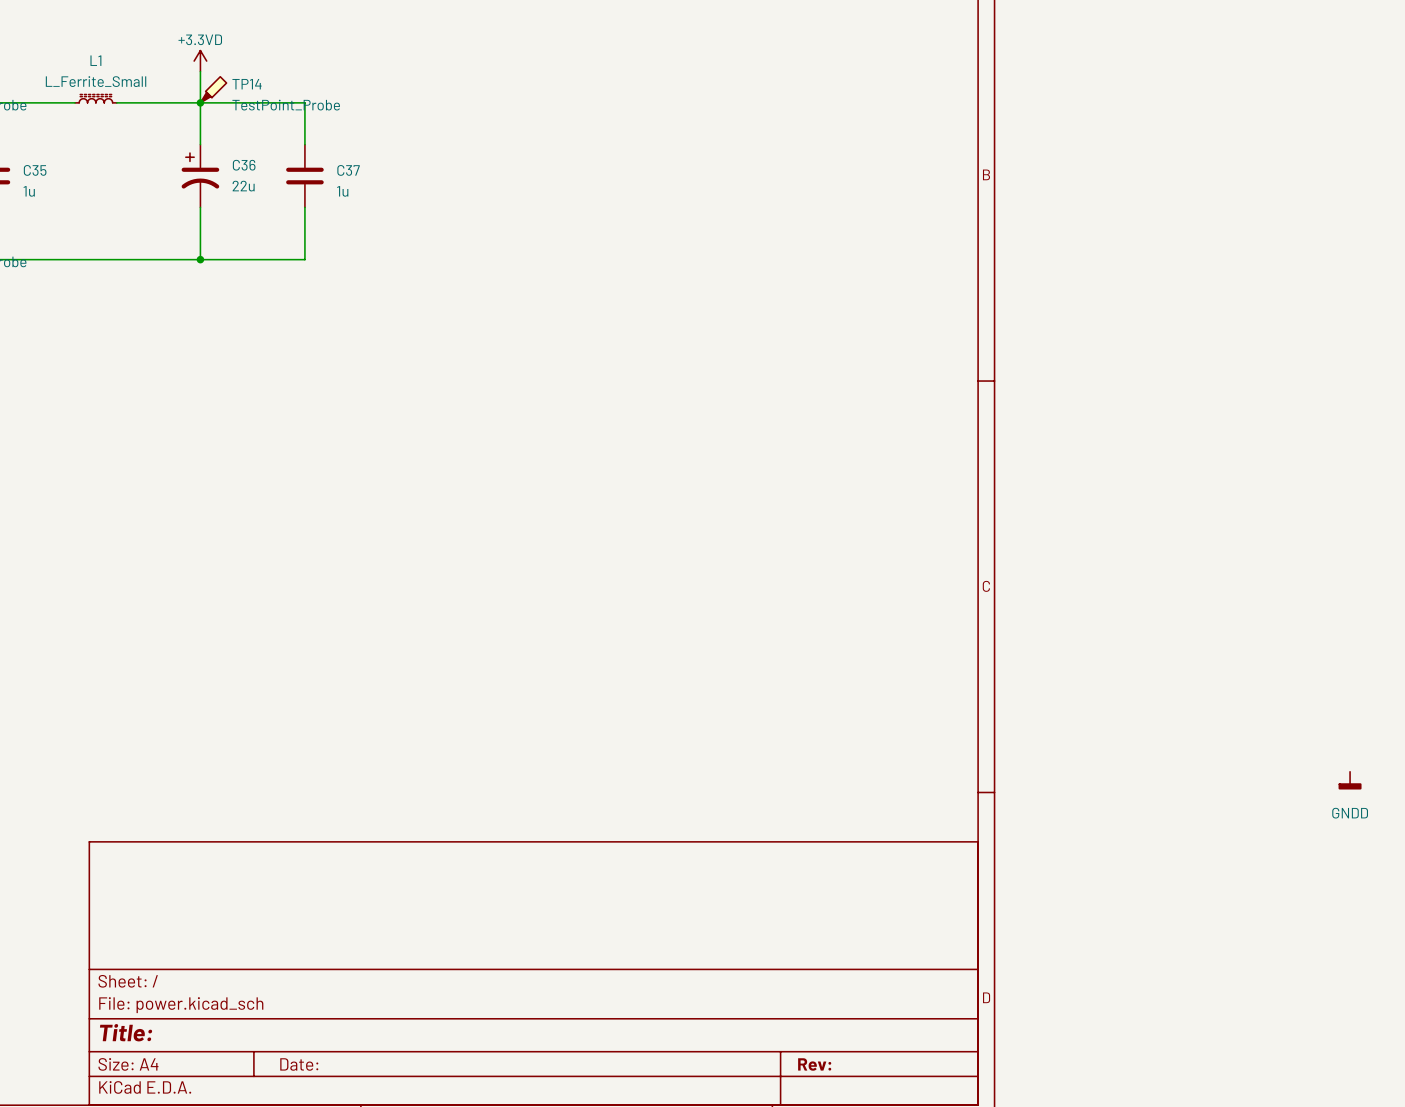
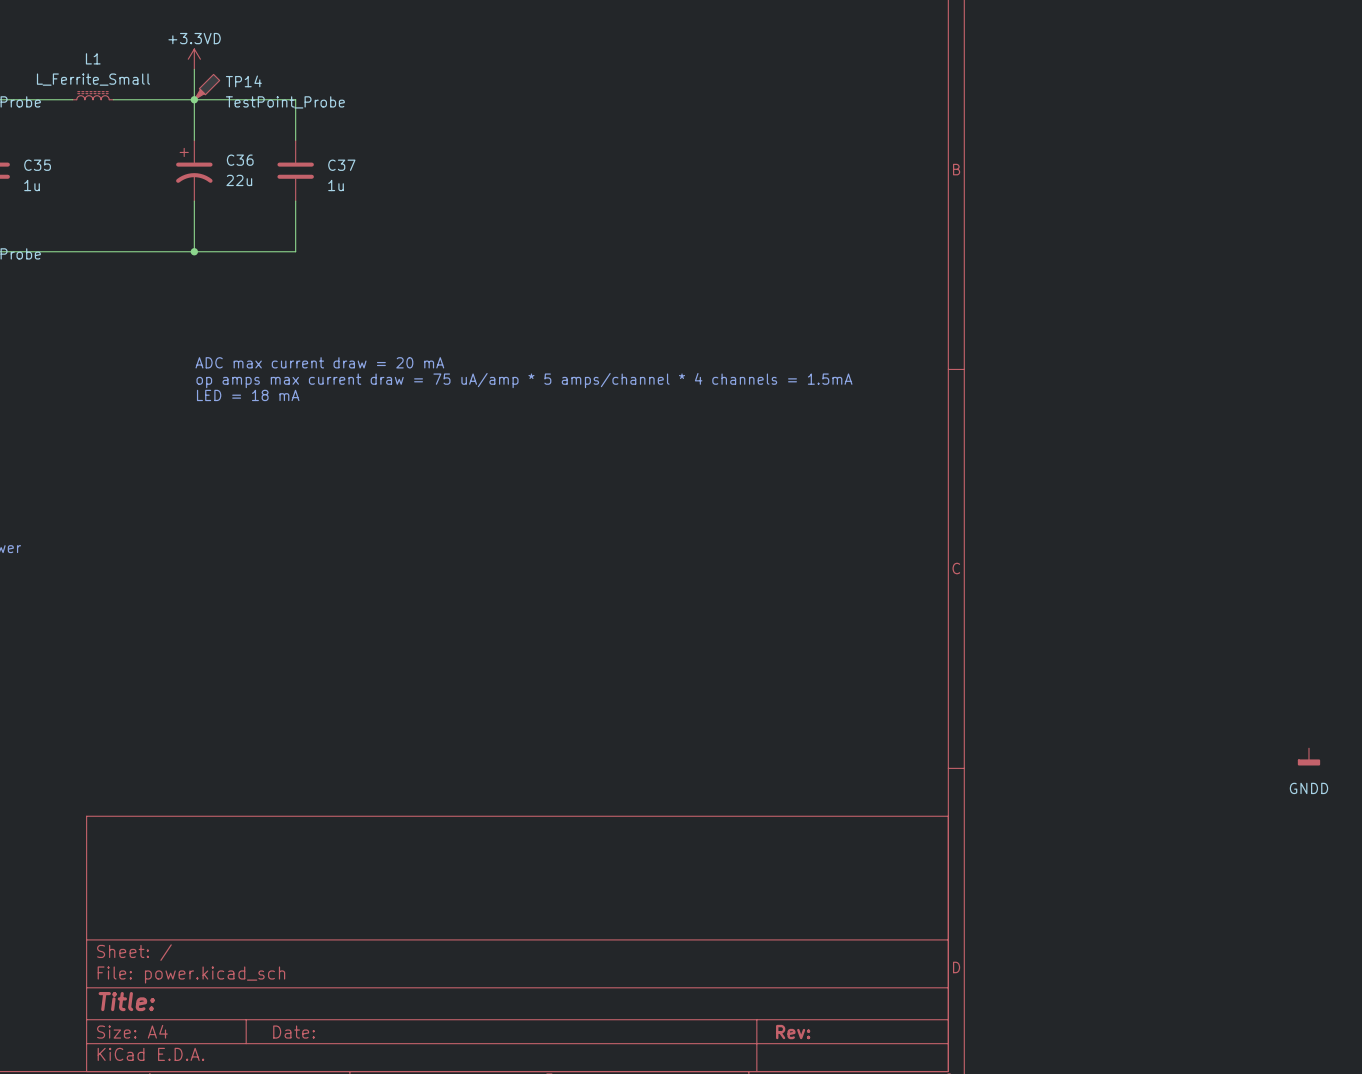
text: none -> ADC max current draw = 20 mA (319, 362)
text: none -> op amps max current draw = 75 uA/amp * 5 amps/channel * 4 channels = 1.5mA (524, 380)
text: none -> LED = 18 mA (248, 395)

